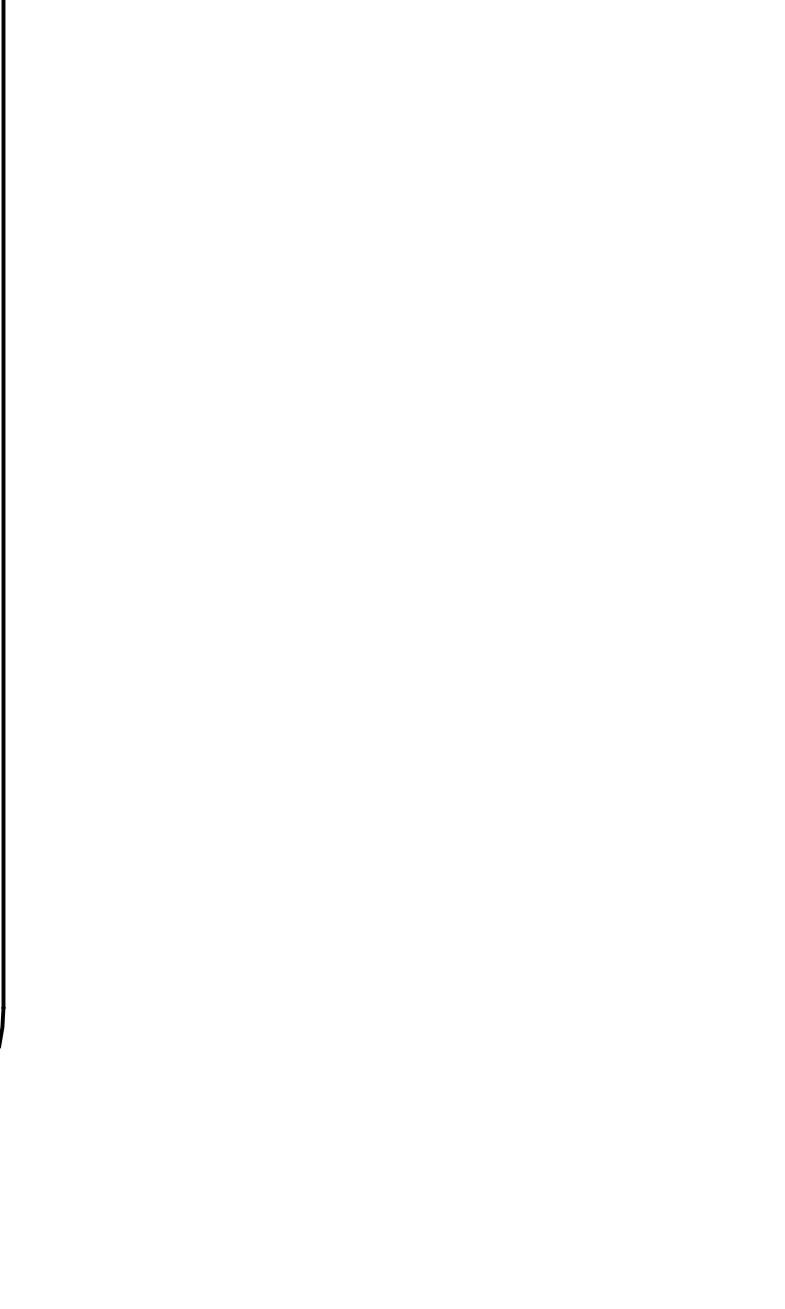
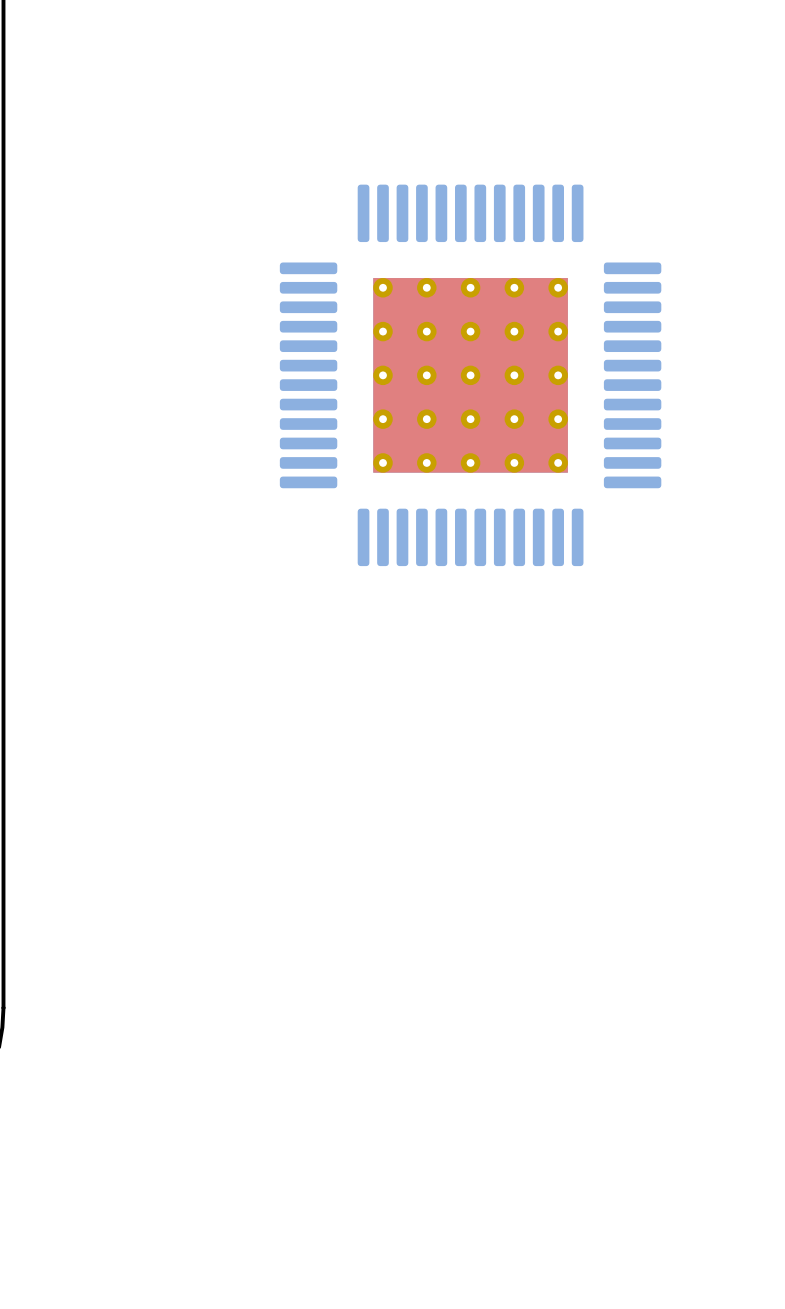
part: none -> (470, 375)

